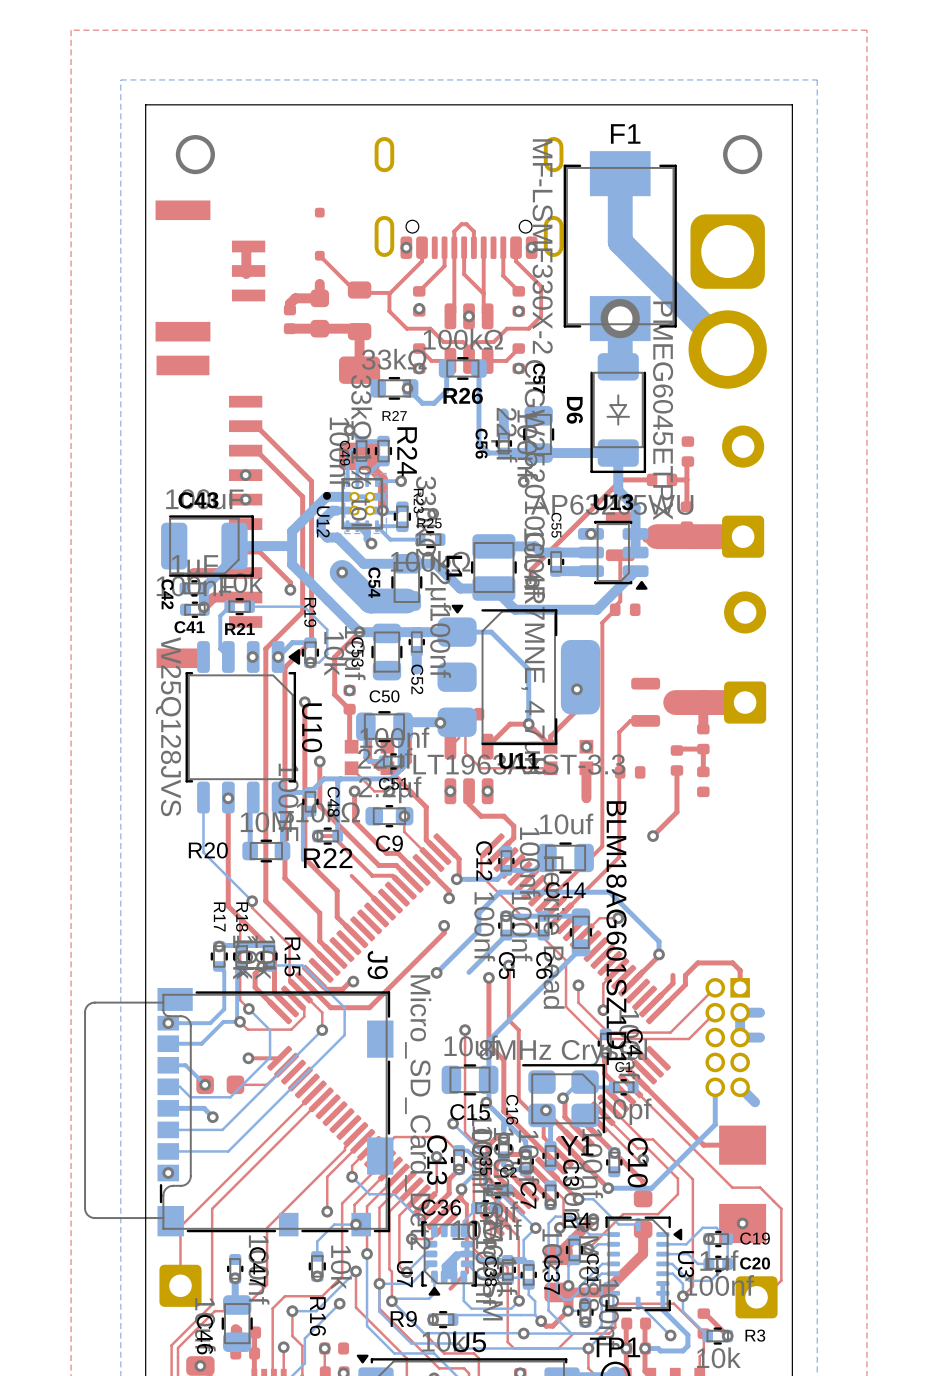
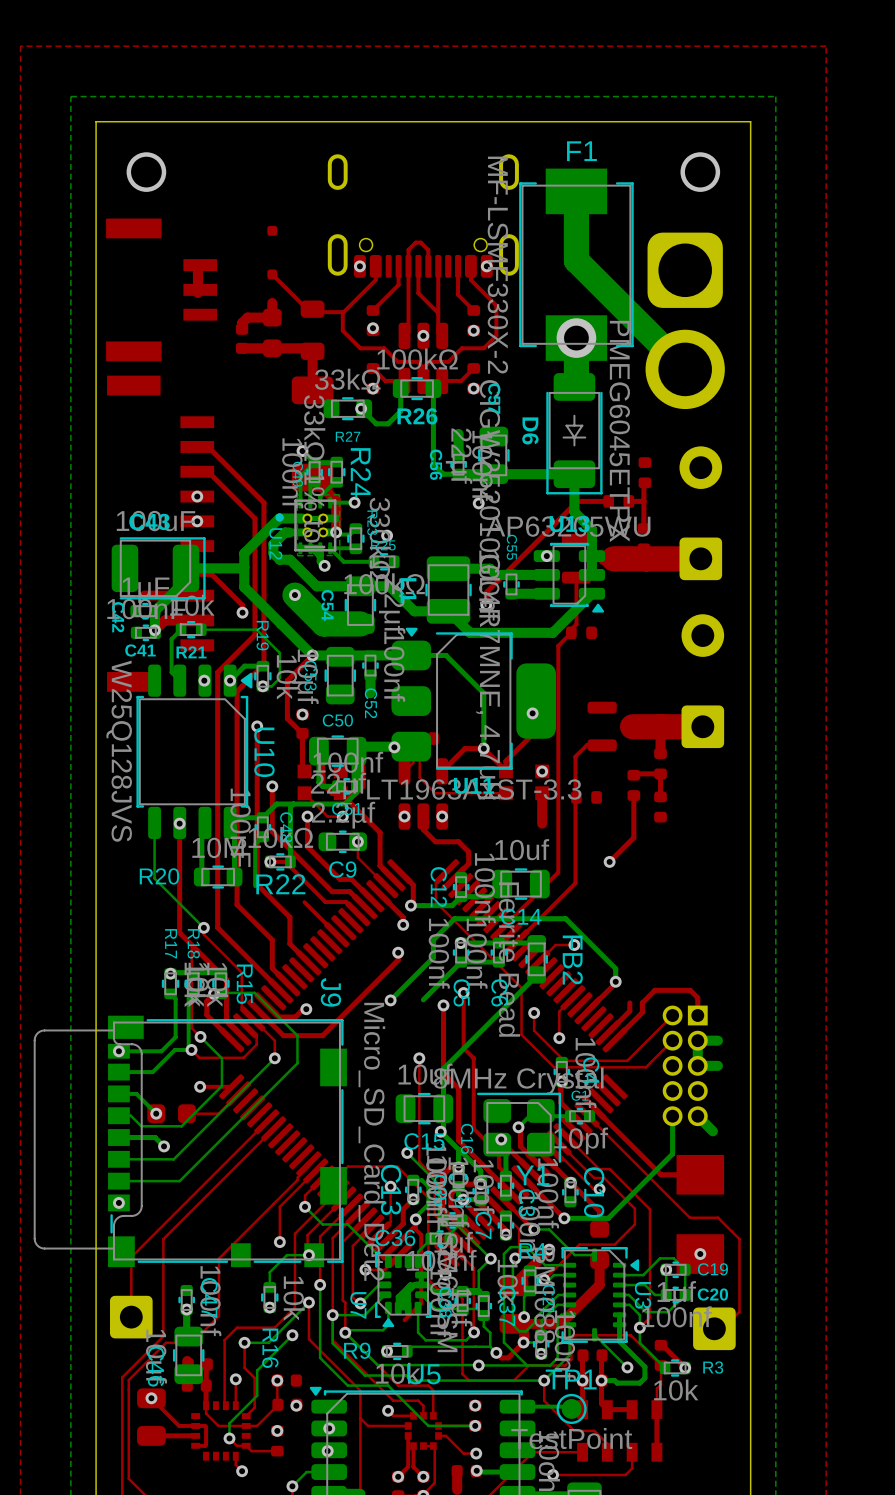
BLM18AG601SZ1D1 name: BLM18AG601SZ1D1 (616, 933) -> FB2 (572, 960)

